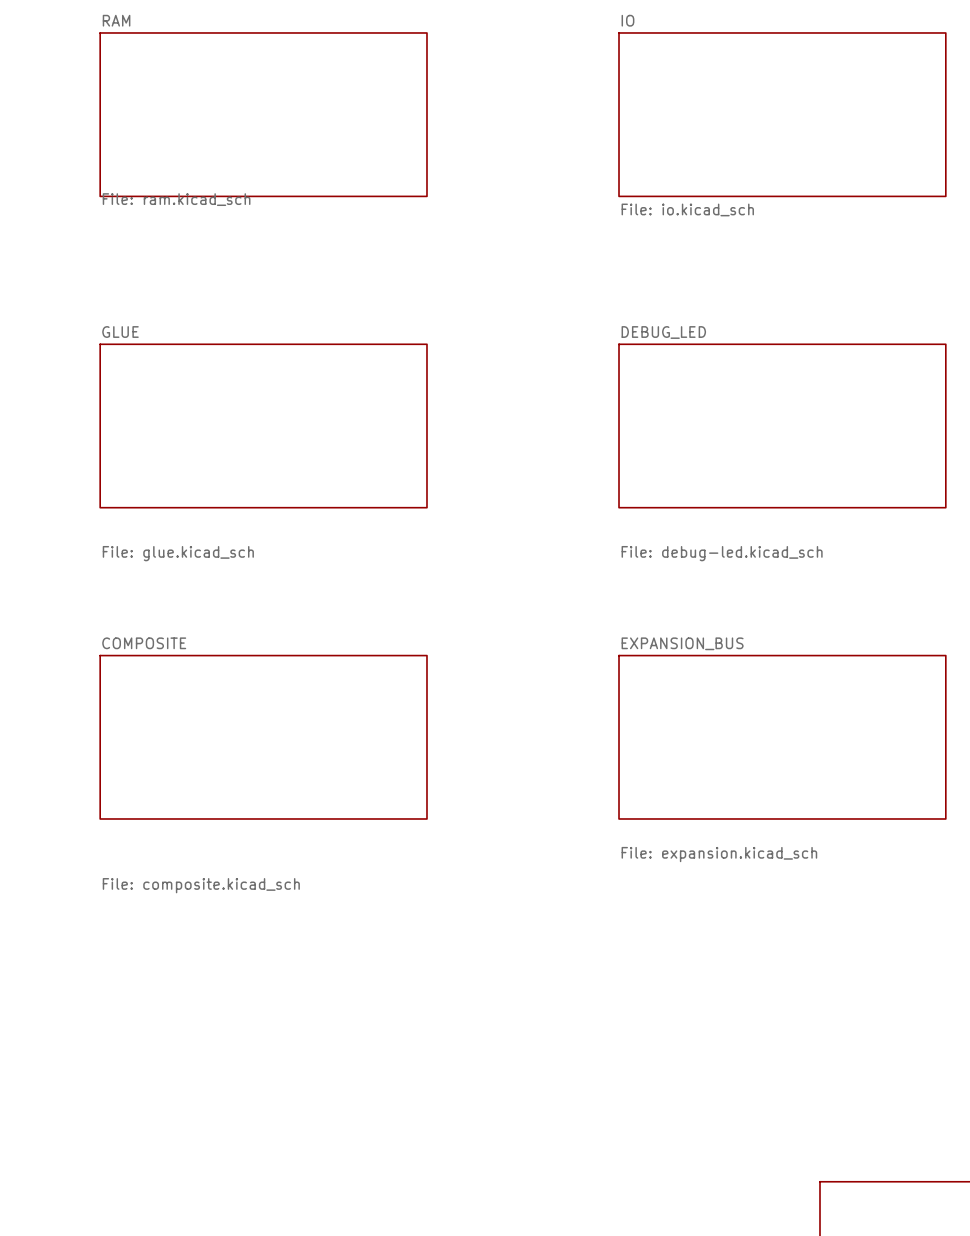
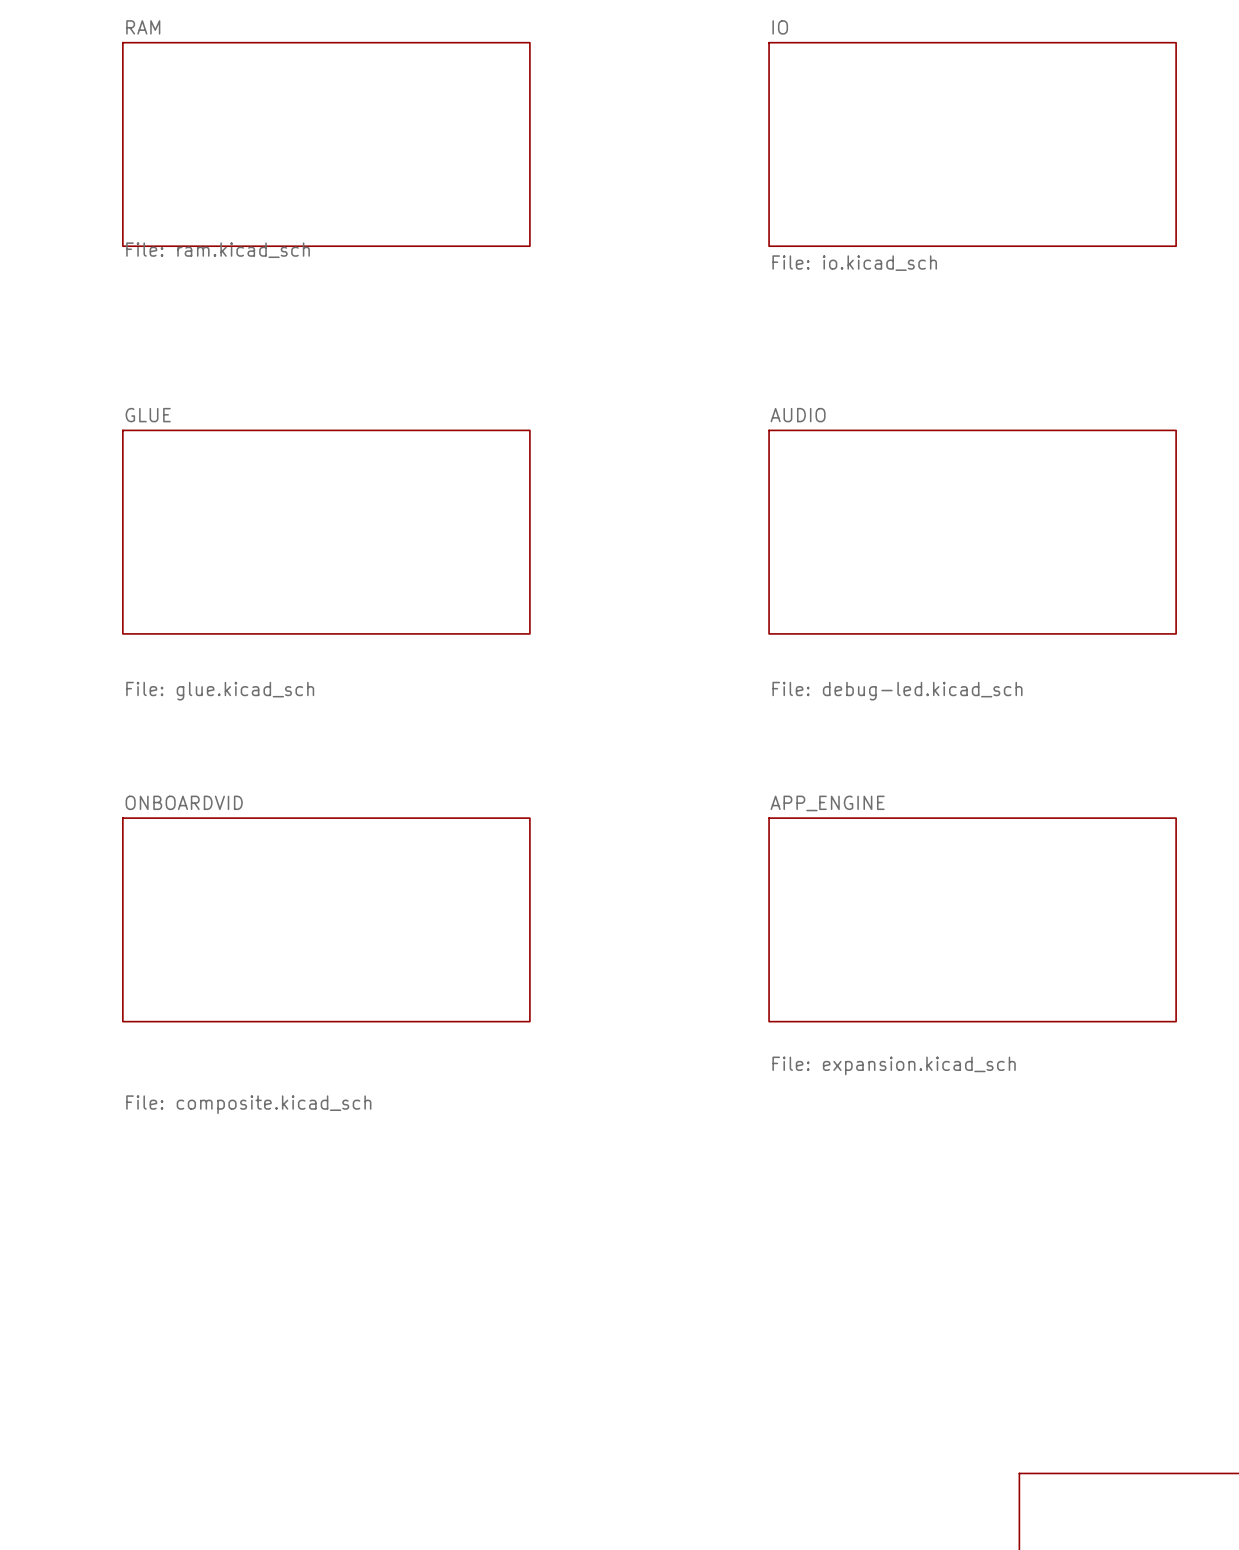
sheet DEBUG_LED name: DEBUG_LED (663, 332) -> AUDIO (798, 415)
sheet COMPOSITE name: COMPOSITE (144, 643) -> ONBOARDVID (184, 802)
sheet EXPANSION_BUS name: EXPANSION_BUS (682, 643) -> APP_ENGINE (827, 803)

